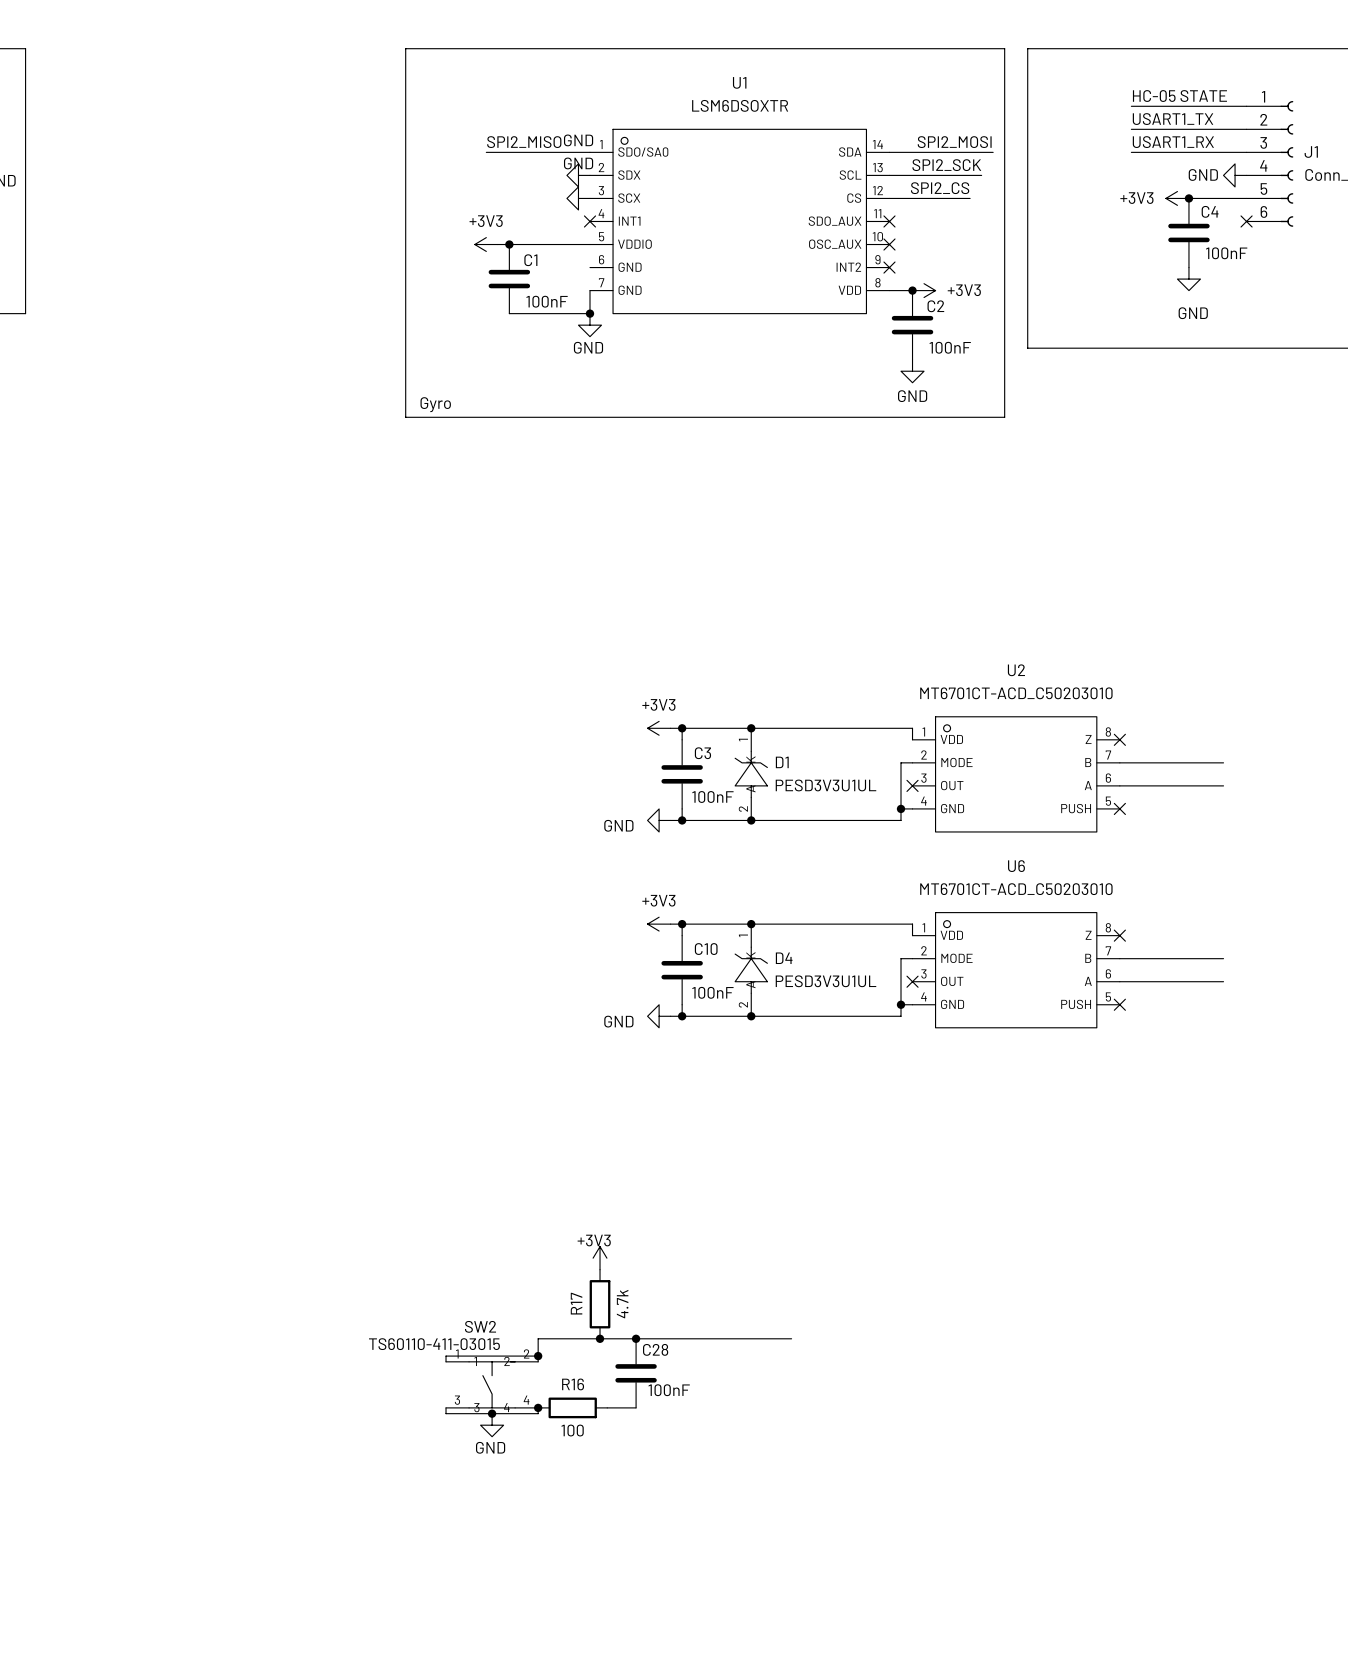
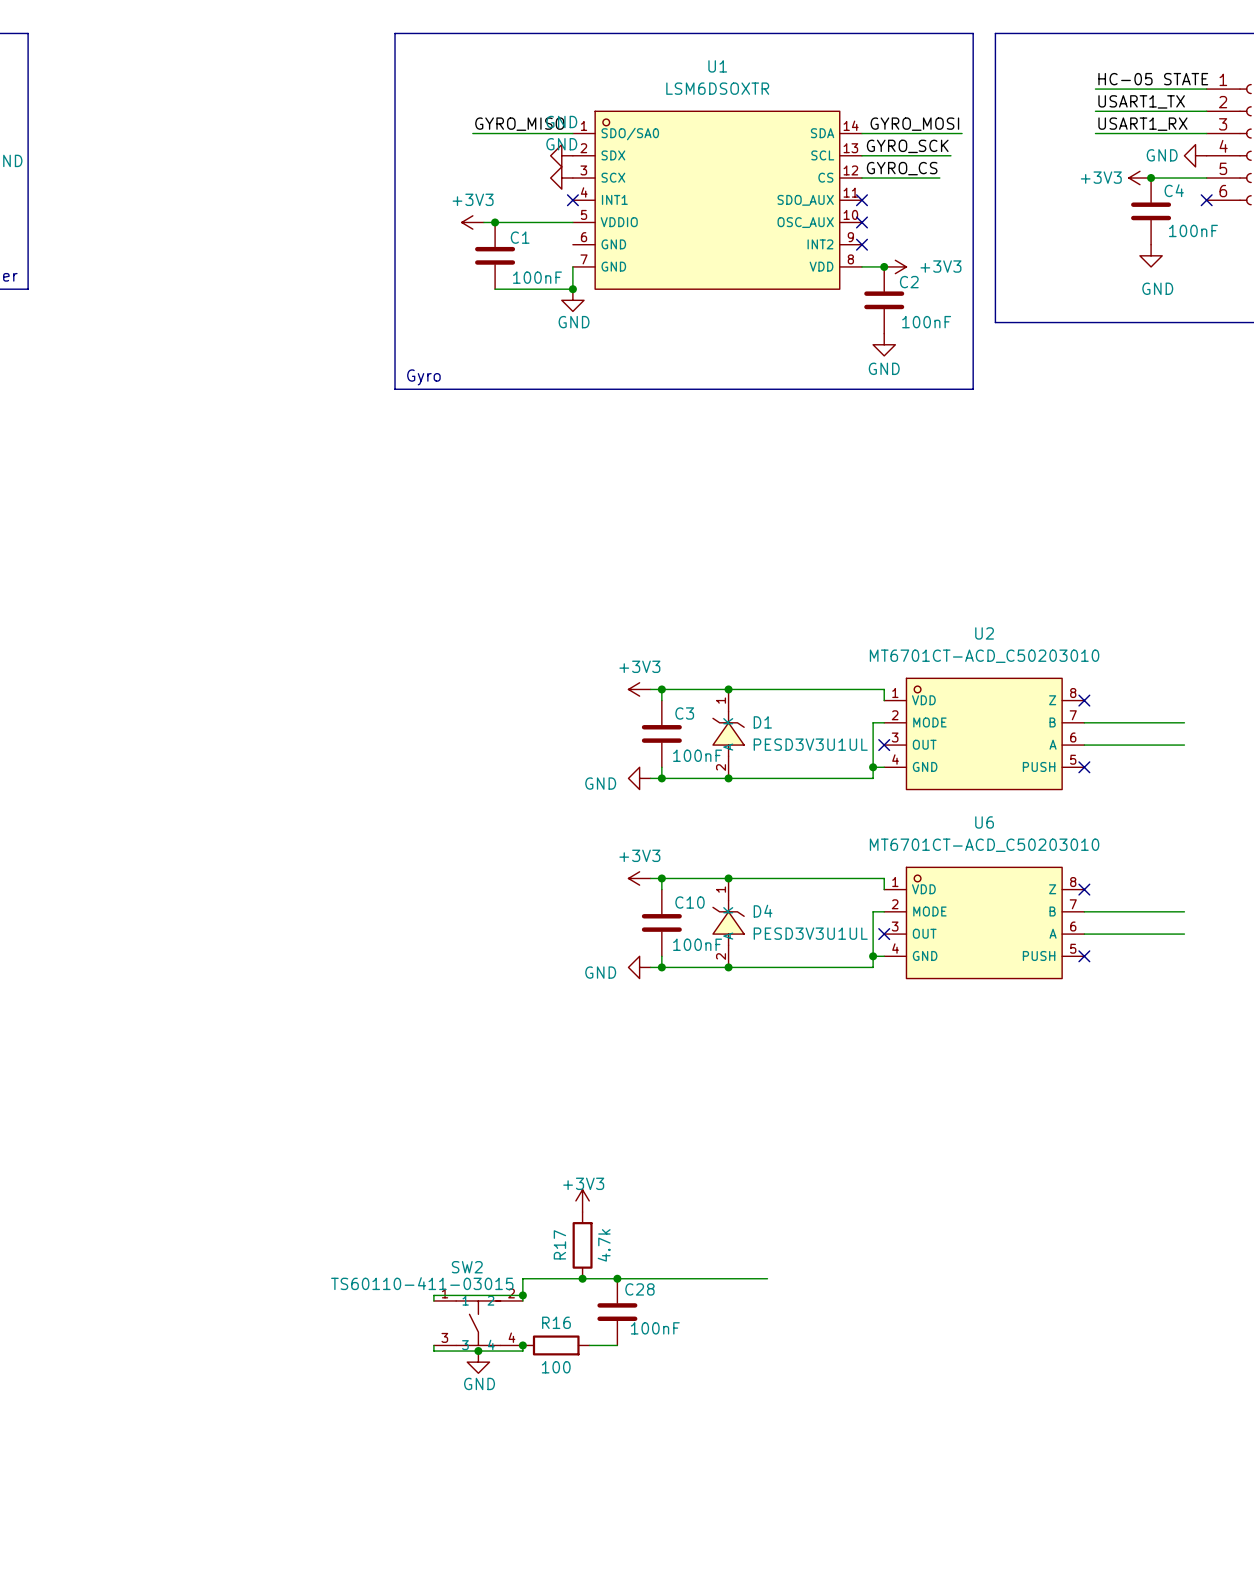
label: SPI2_MISO (524, 142) -> GYRO_MISO (519, 124)
label: SPI2_MOSI (954, 142) -> GYRO_MOSI (914, 124)
label: SPI2_SCK (946, 165) -> GYRO_SCK (907, 146)
label: SPI2_CS (940, 188) -> GYRO_CS (902, 168)

